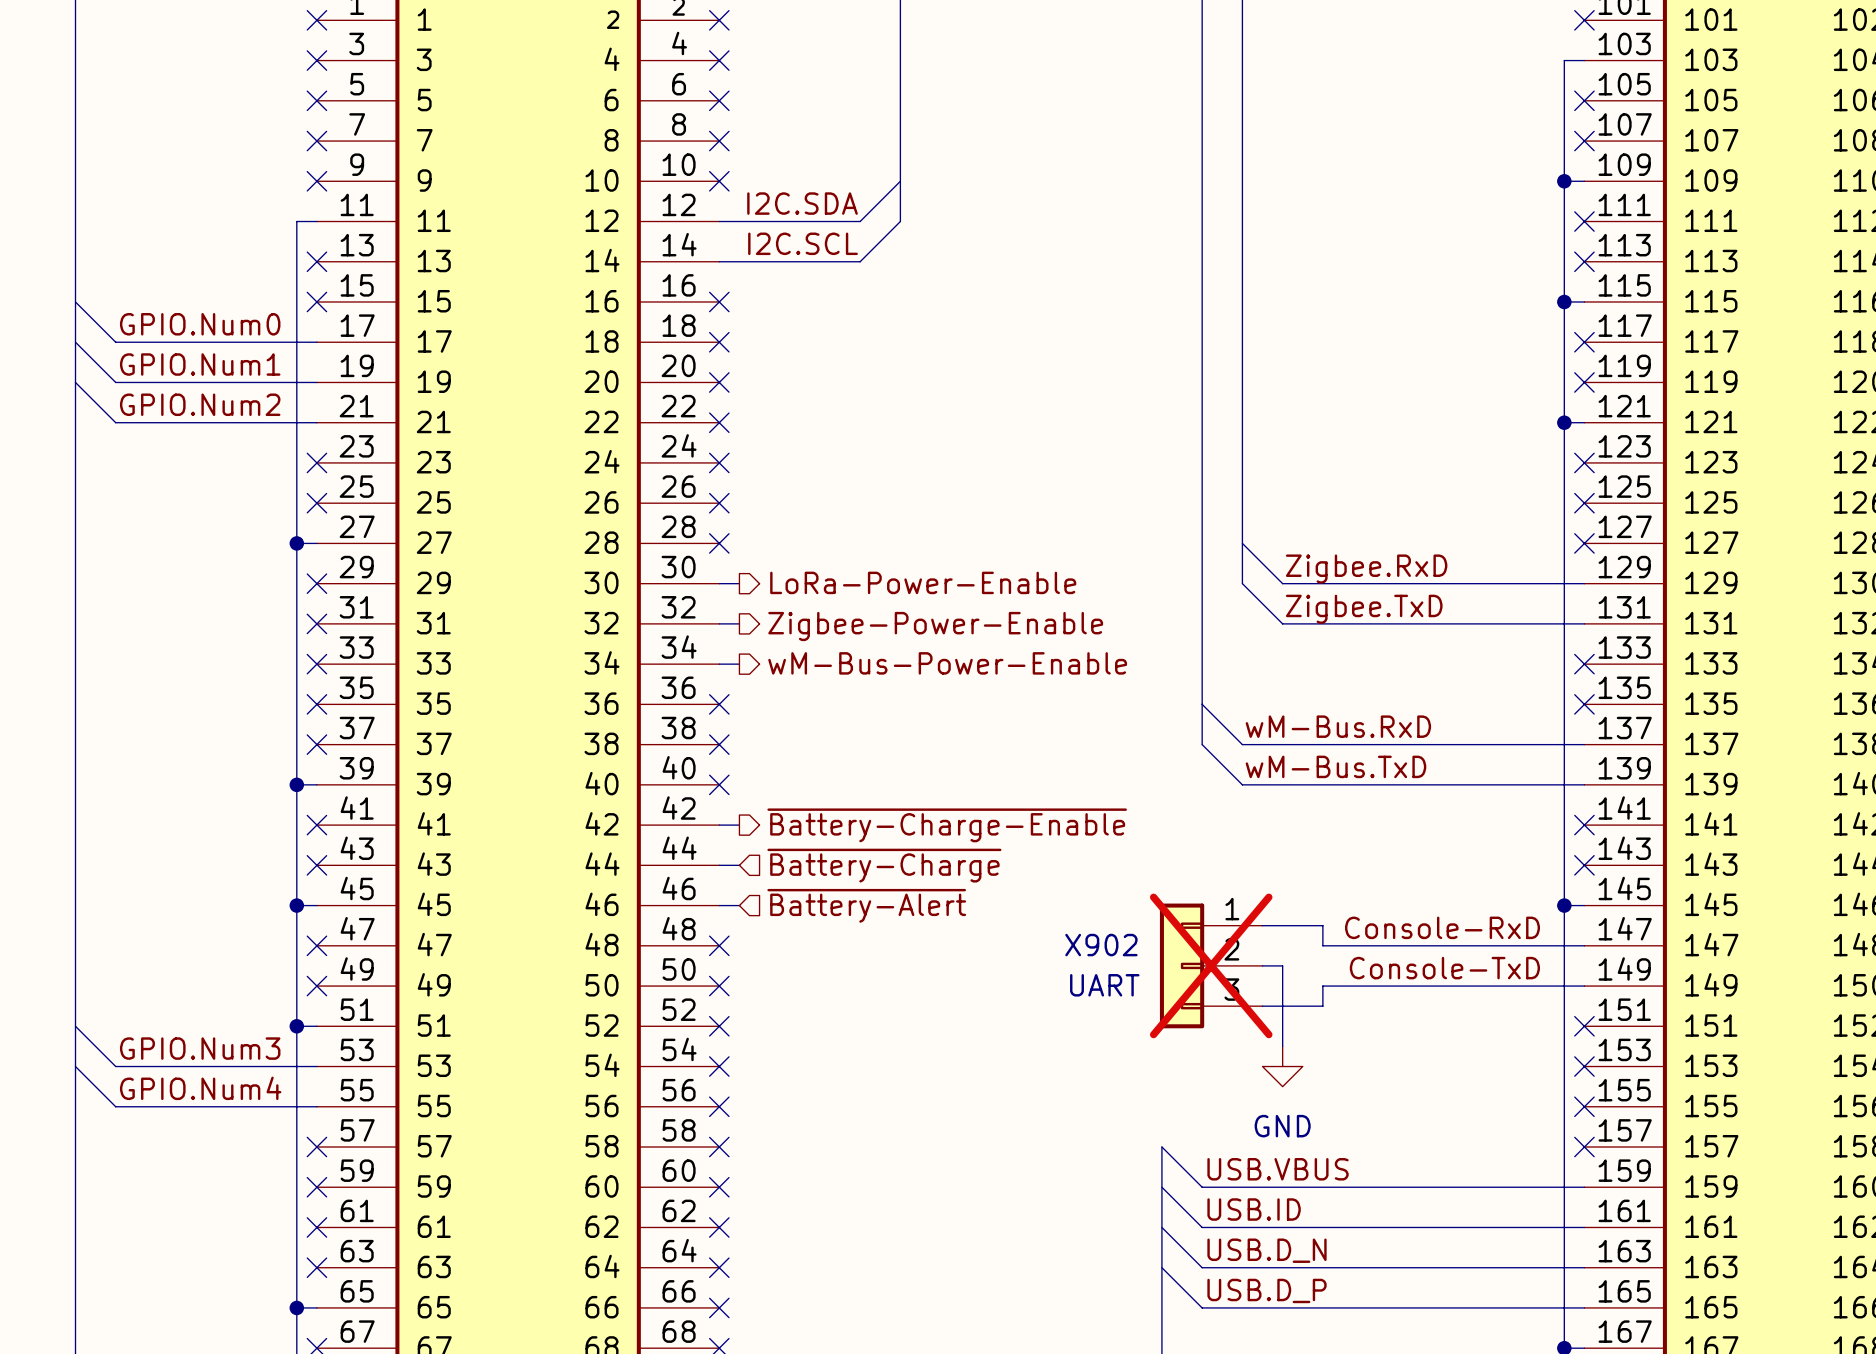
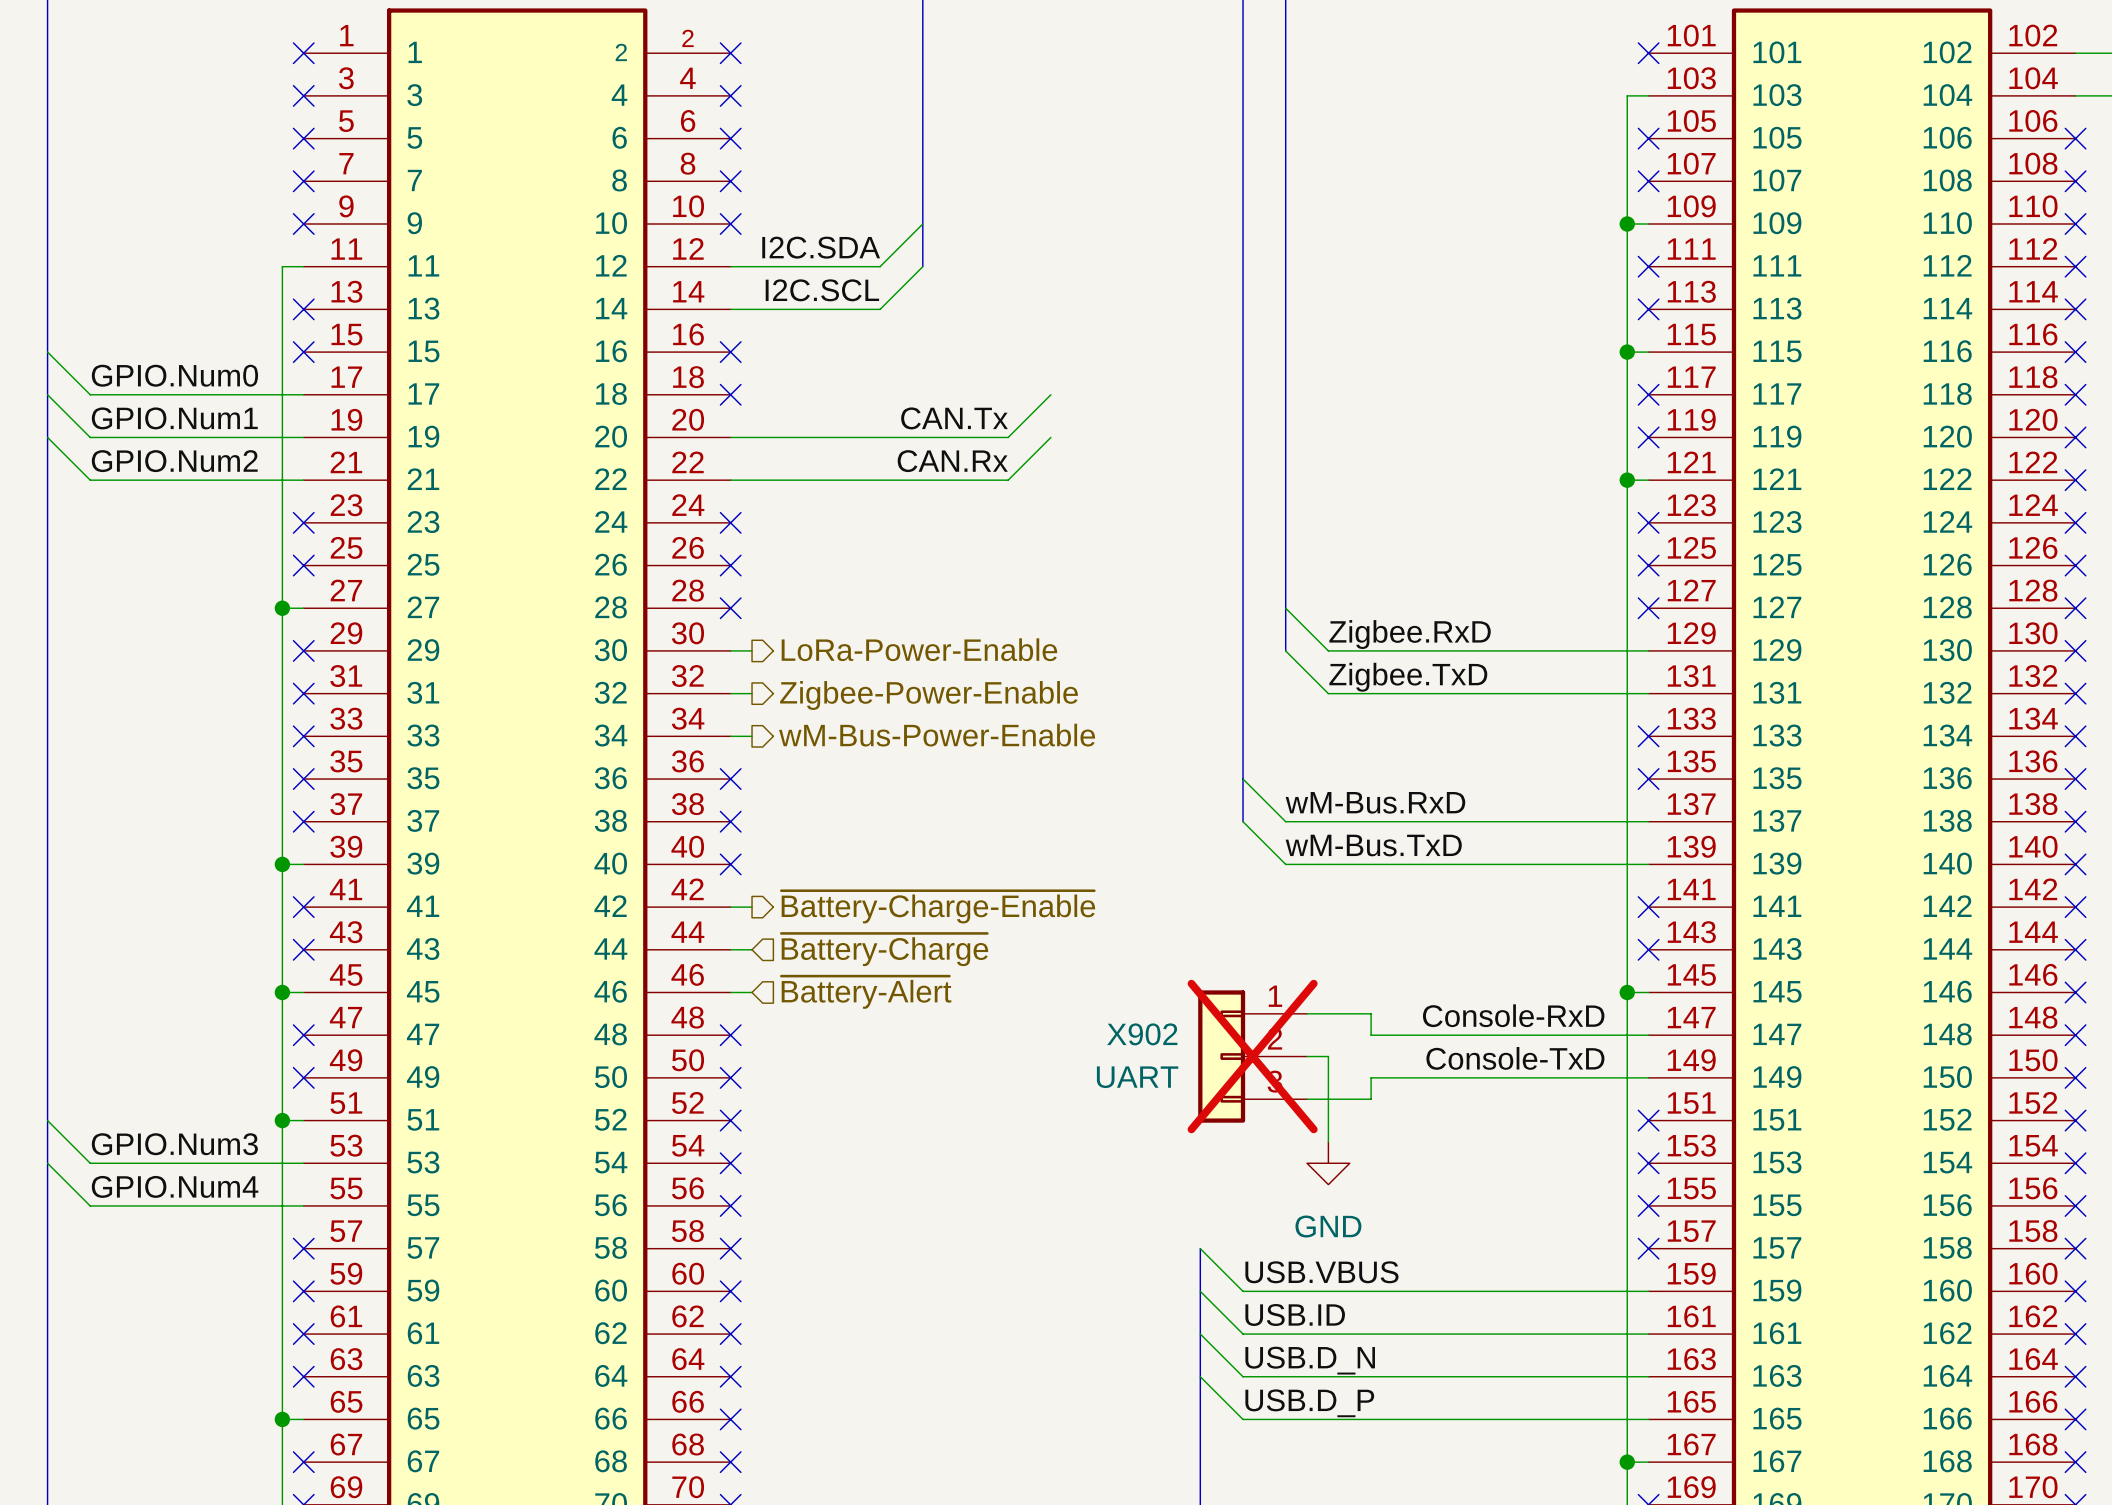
wire: none -> (1050, 394) (1008, 437) (730, 437)
label: none -> CAN.Tx (954, 418)
no-connect mark: (719, 382) -> none
wire: none -> (1050, 437) (1008, 480) (730, 480)
label: none -> CAN.Rx (952, 461)
no-connect mark: (719, 422) -> none

